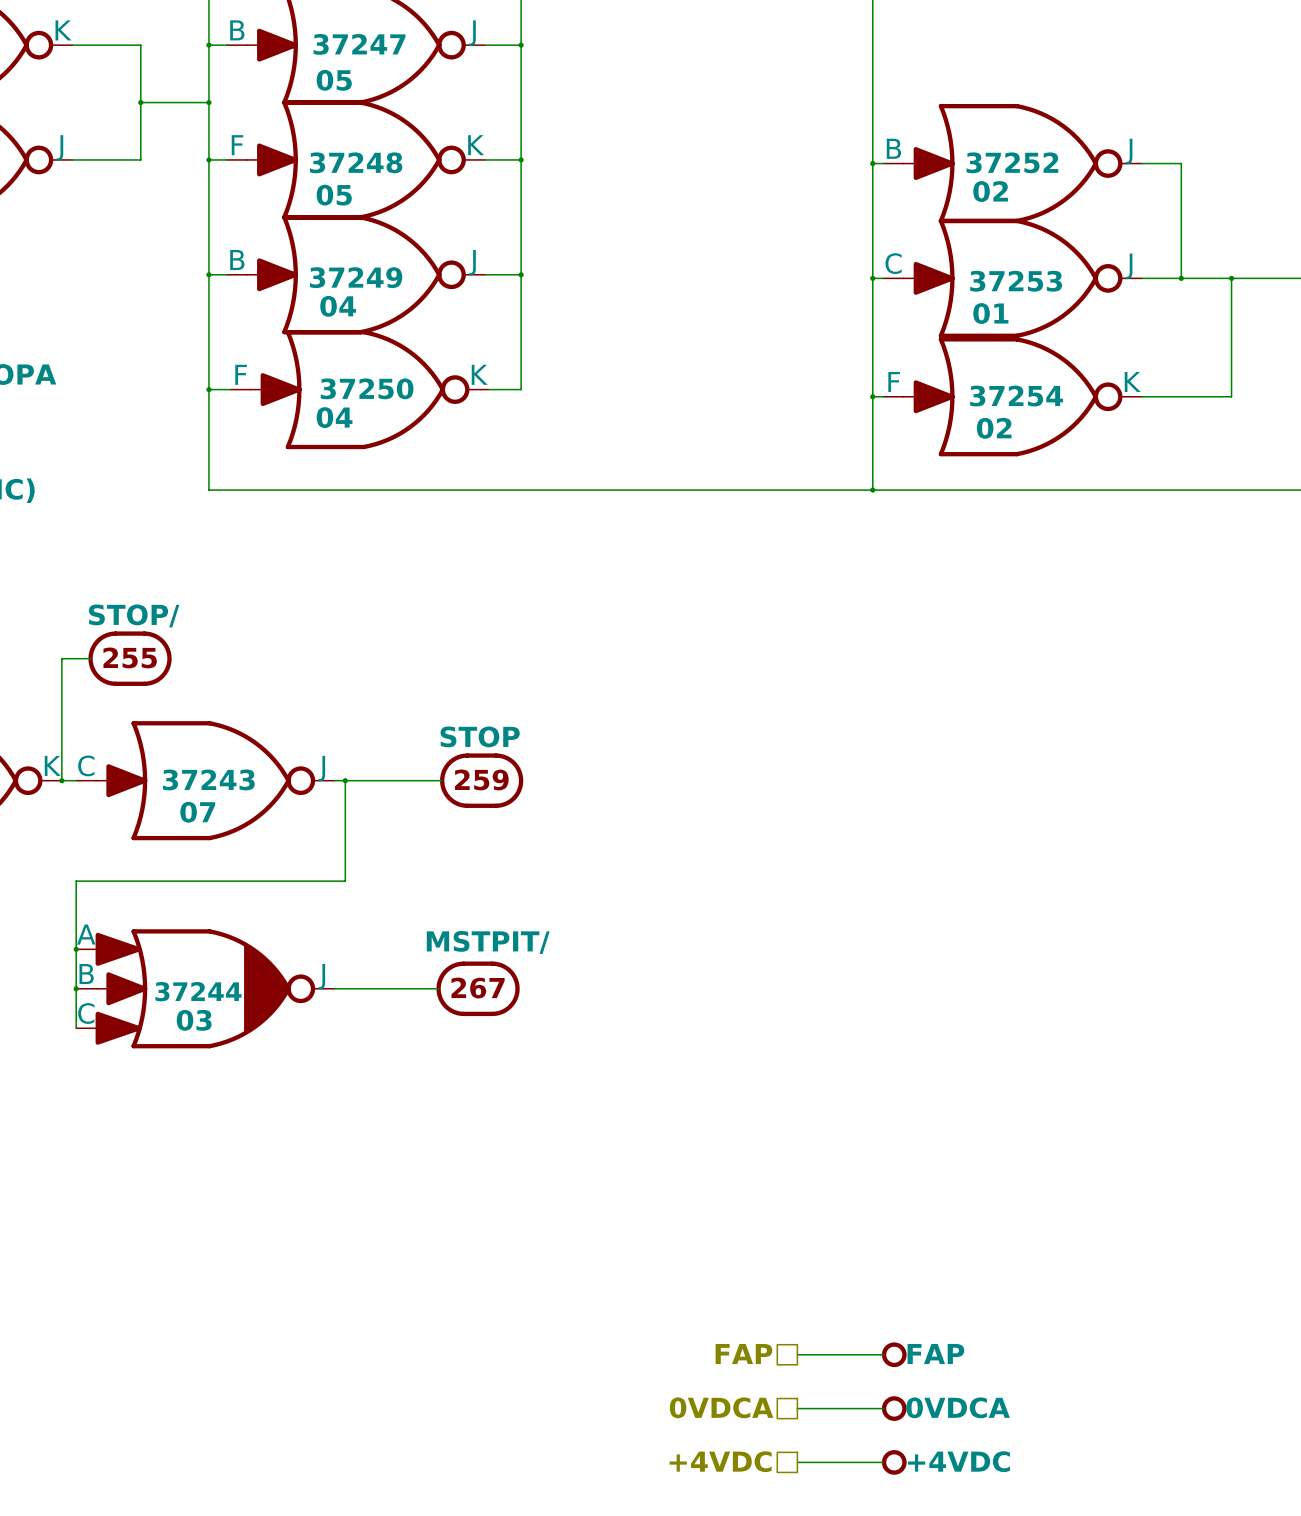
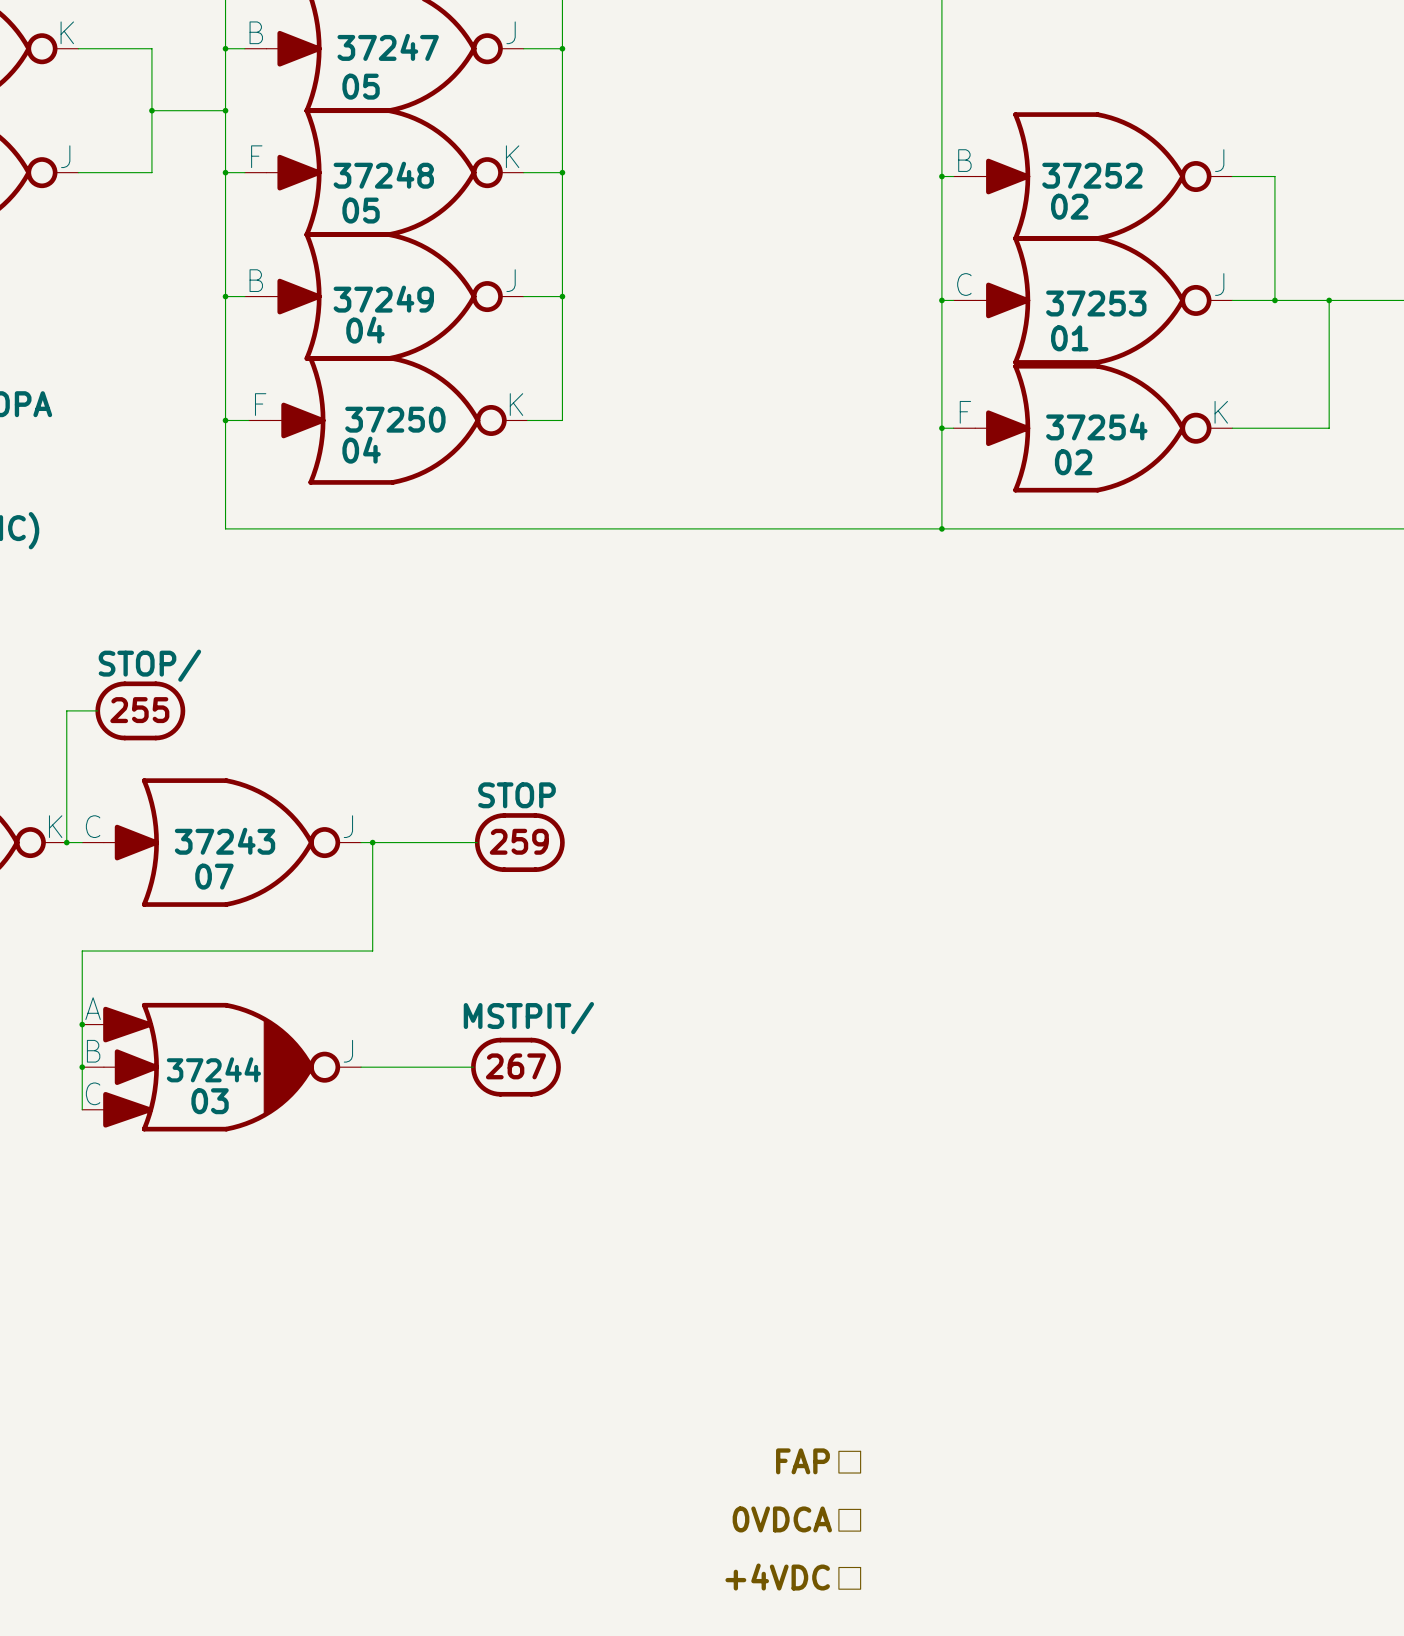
wire: (797, 1354) (883, 1354) -> none
part: (894, 1354) -> none
wire: (797, 1408) (883, 1408) -> none
part: (894, 1408) -> none
wire: (797, 1462) (883, 1462) -> none
part: (894, 1462) -> none

